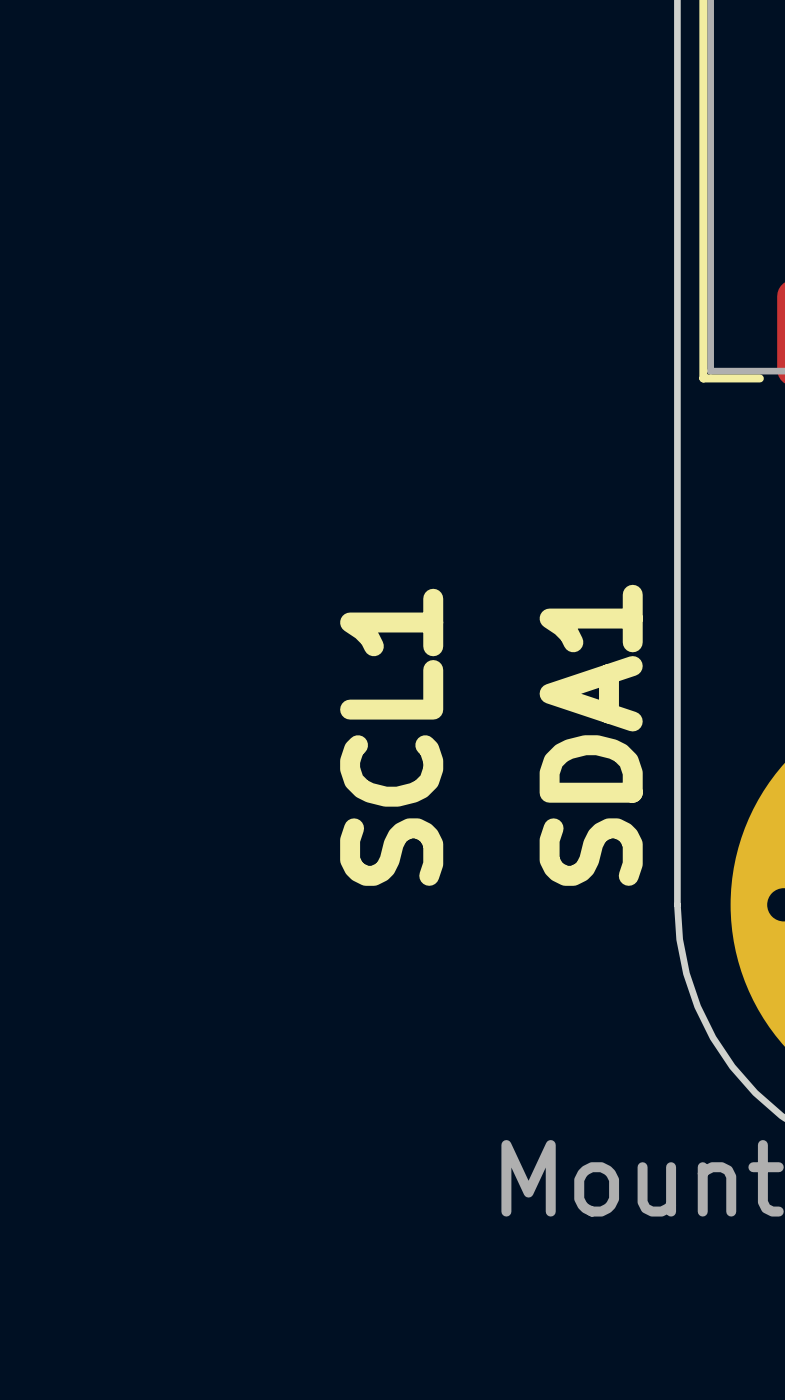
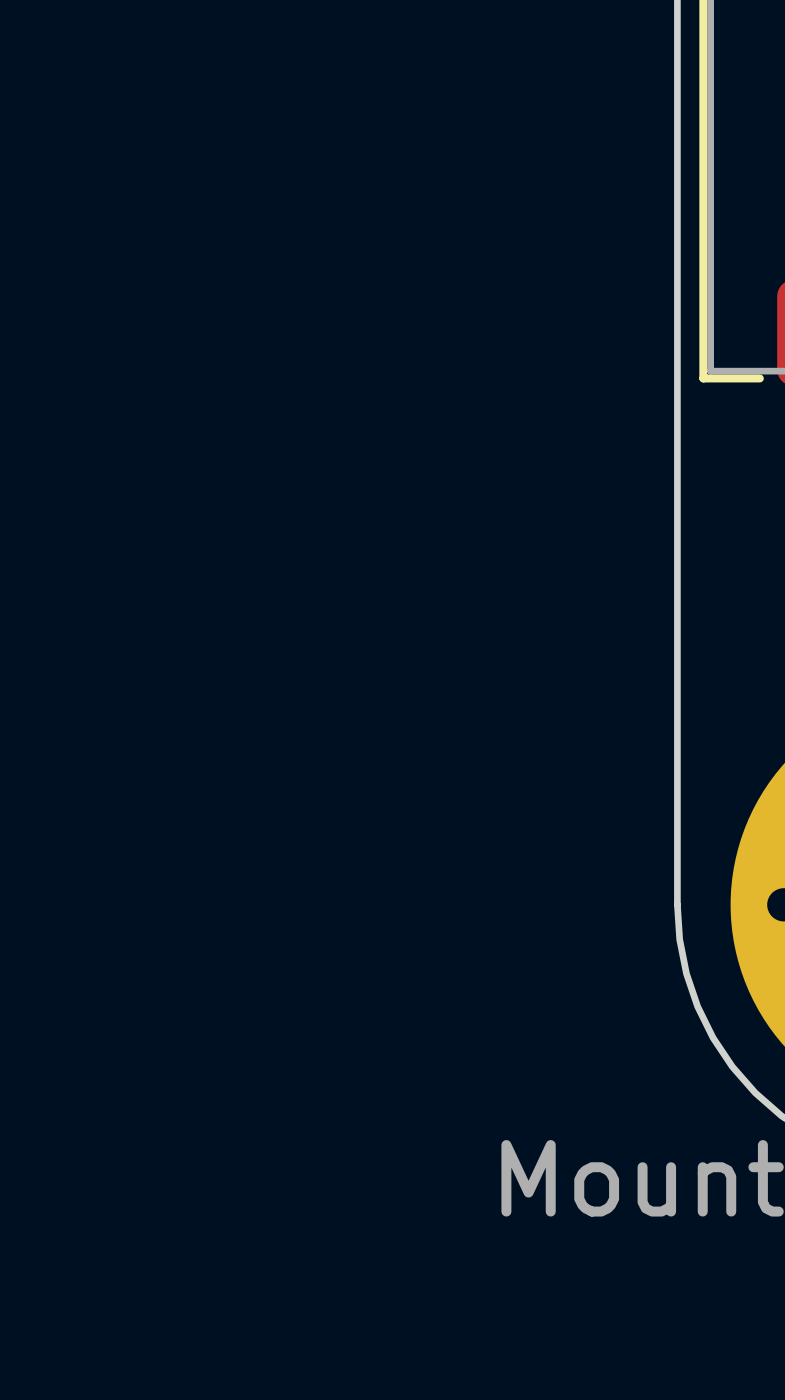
text: SDA1 (591, 735) -> none
text: SCL1 (391, 737) -> none

